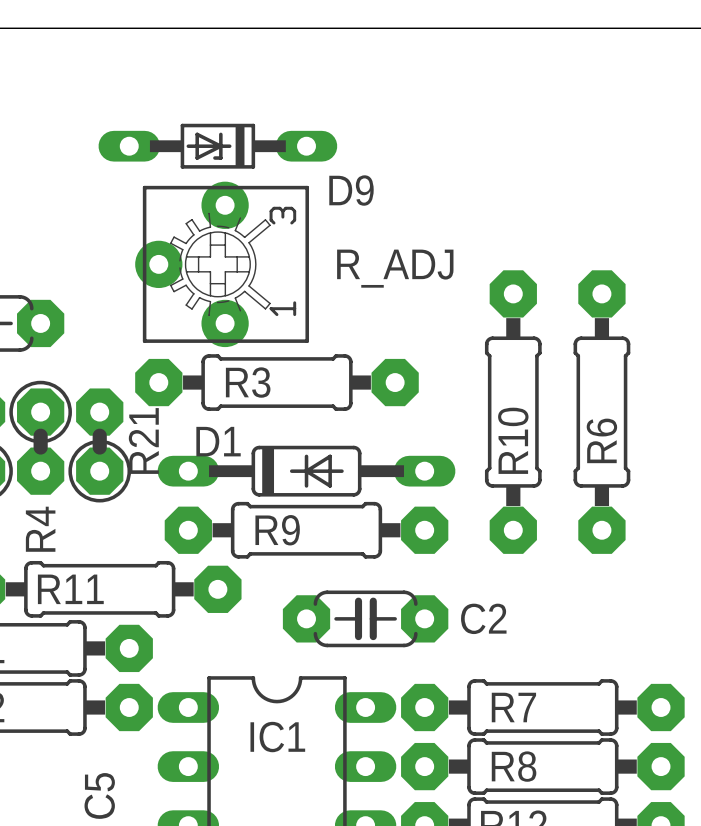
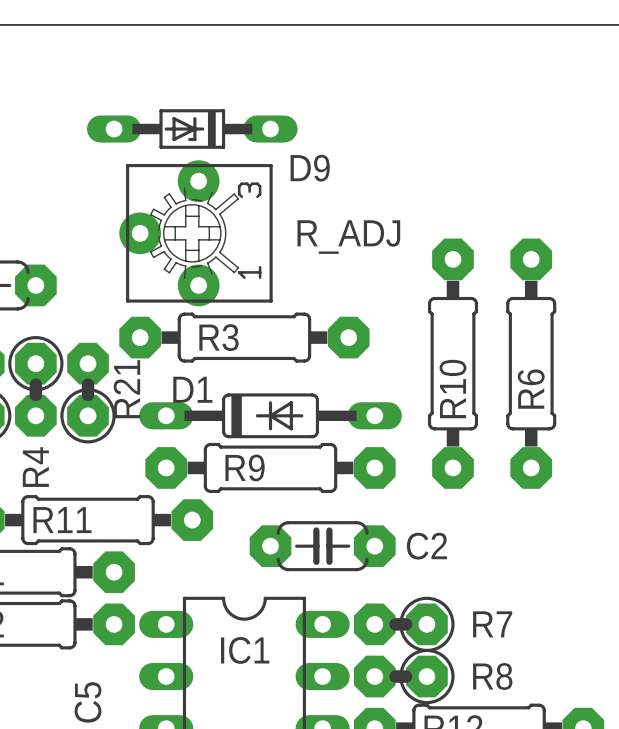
R7 footprint: [401, 679, 685, 736] -> [353, 596, 455, 653]
R7 name position: R7 (513, 707) -> R7 (492, 624)
R8 footprint: [401, 738, 685, 795] -> [353, 648, 455, 705]
R8 name position: R8 (514, 766) -> R8 (492, 676)

